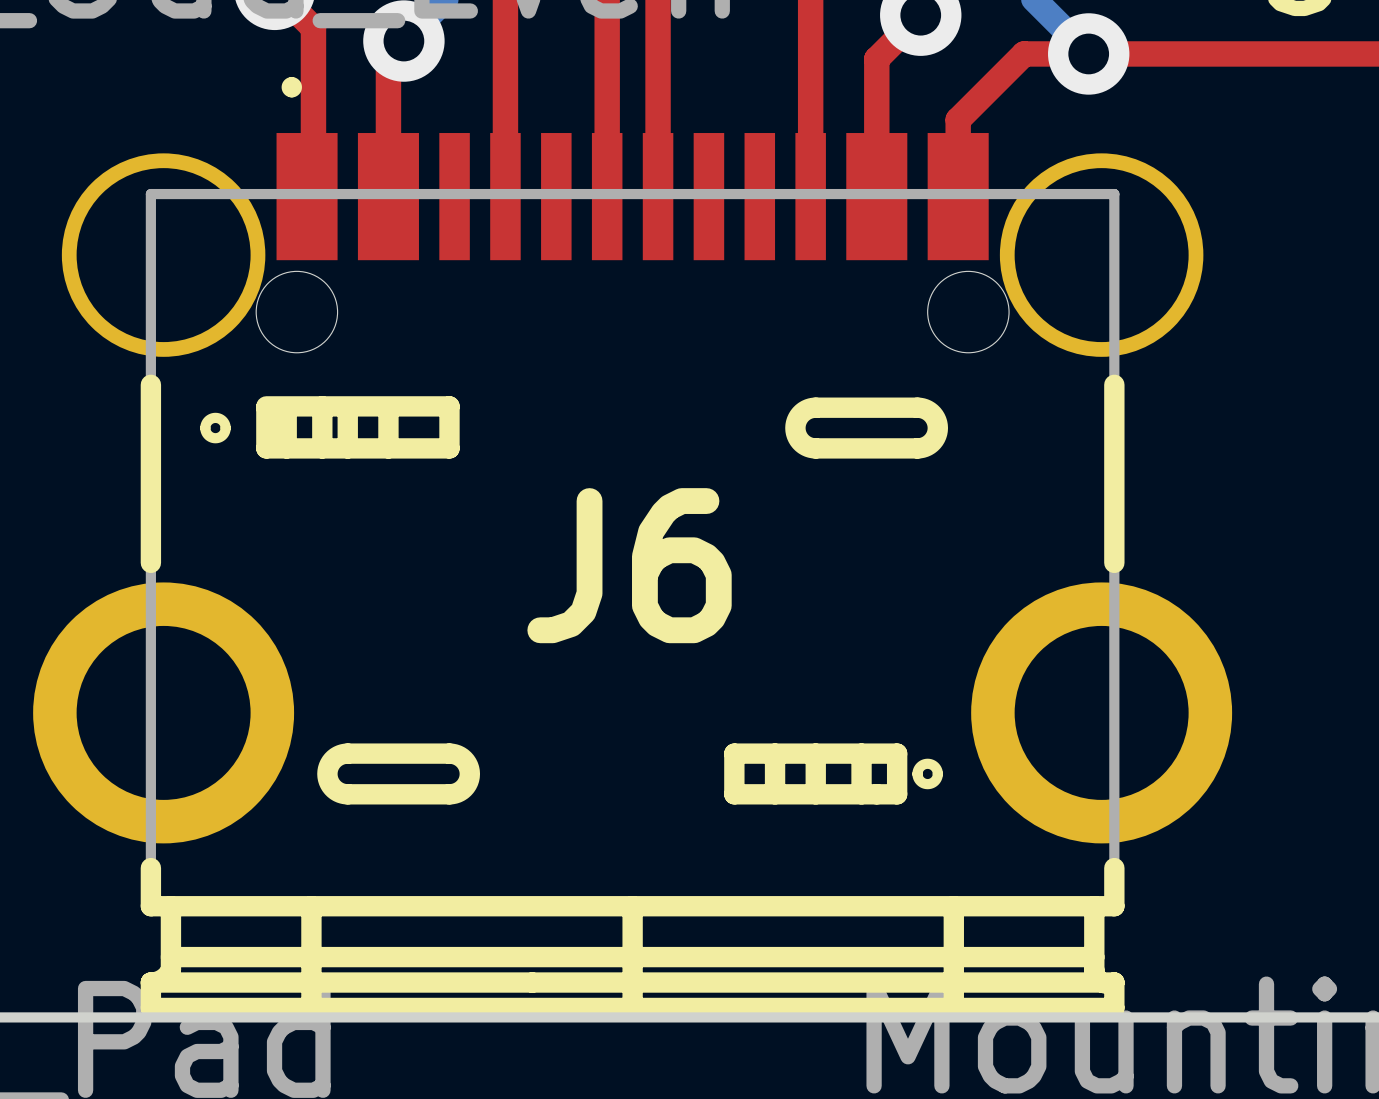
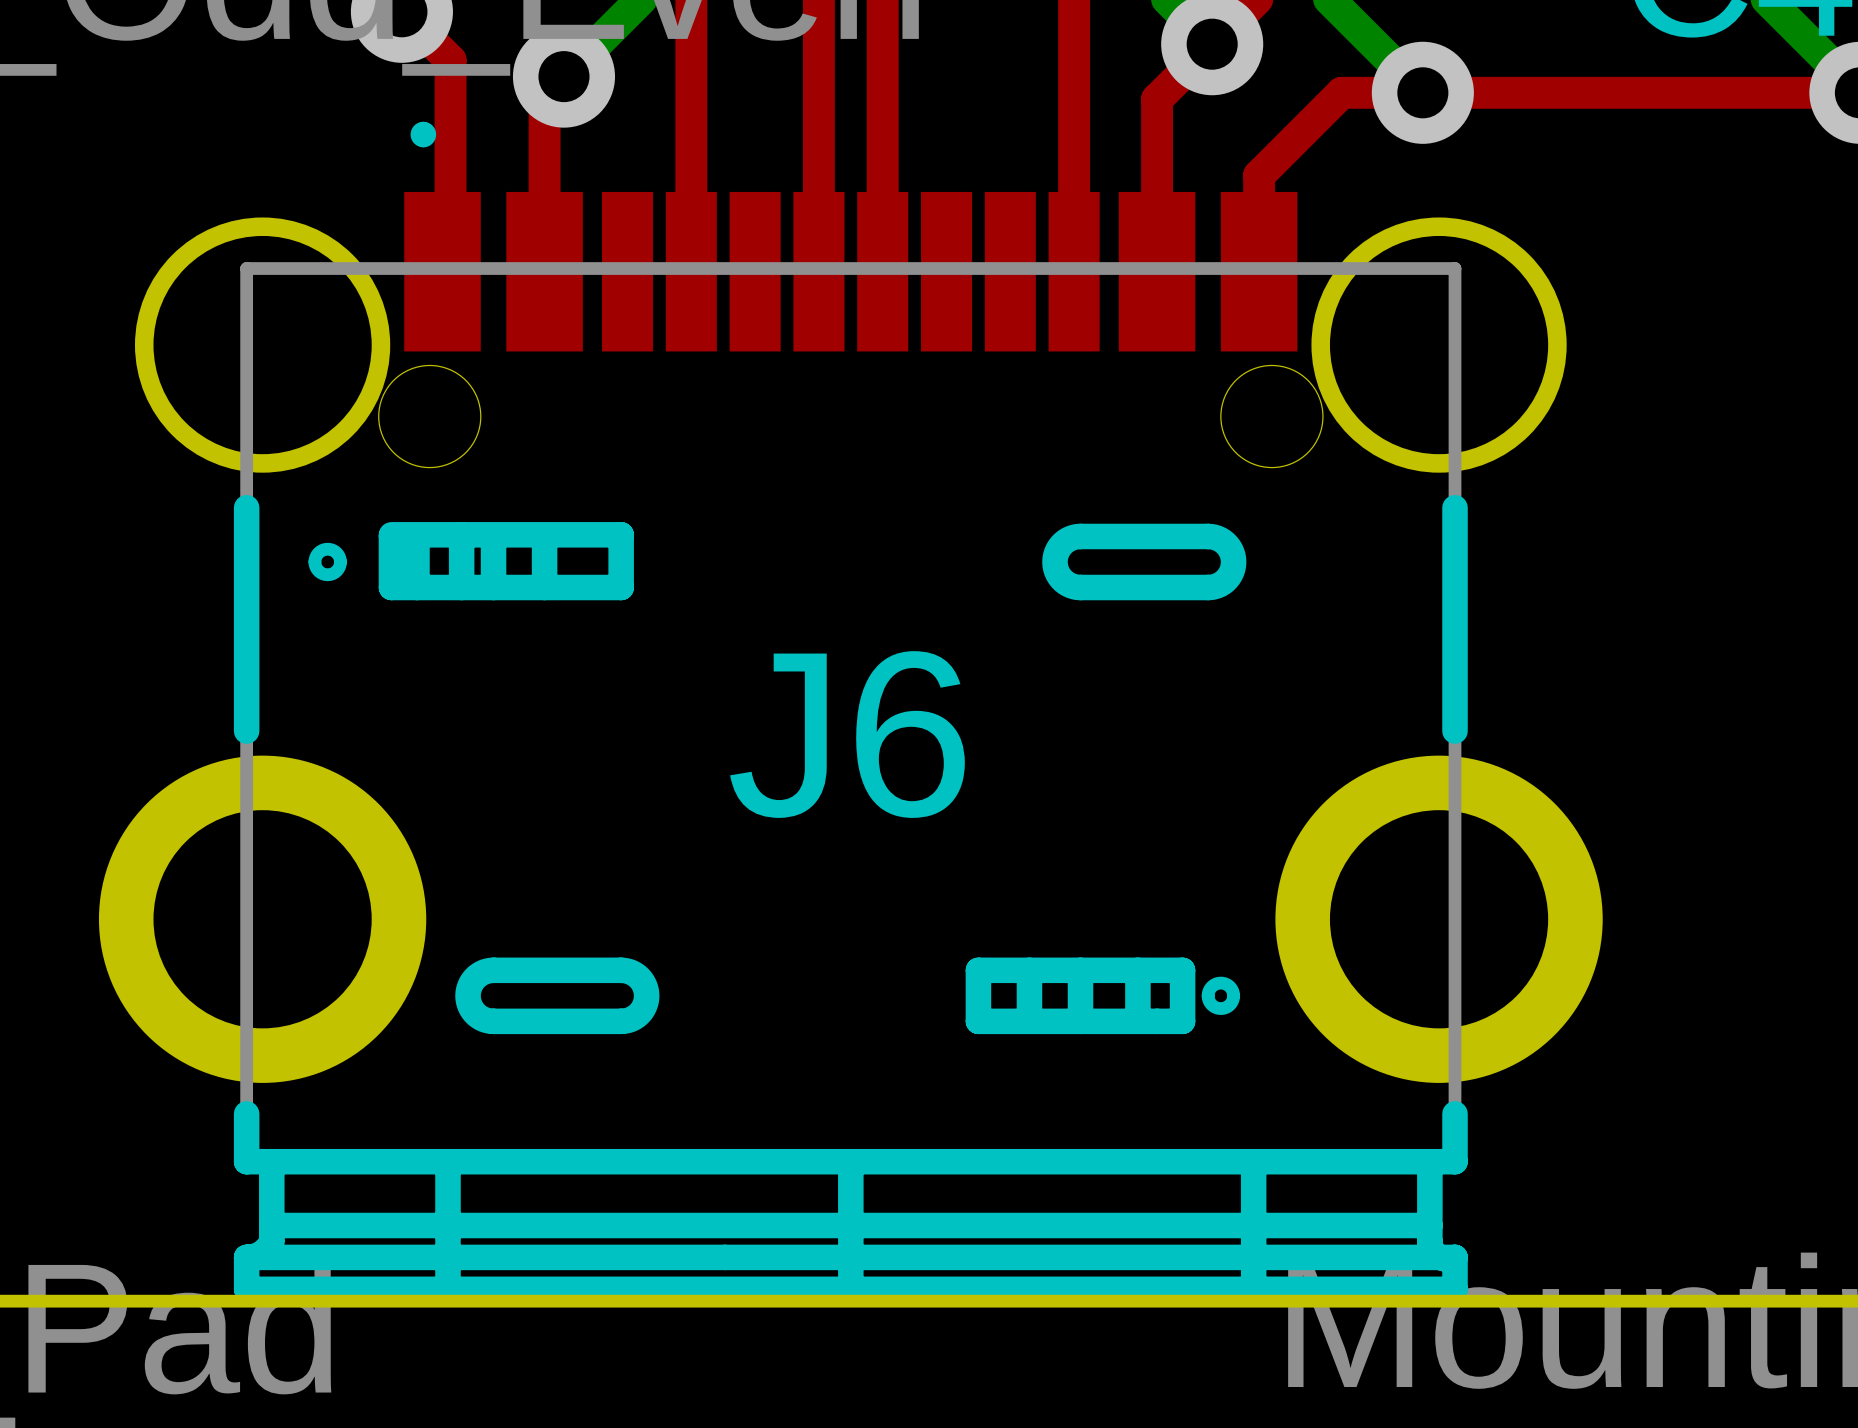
J6 footprint: [33, 77, 1233, 1019] -> [98, 121, 1603, 1303]

